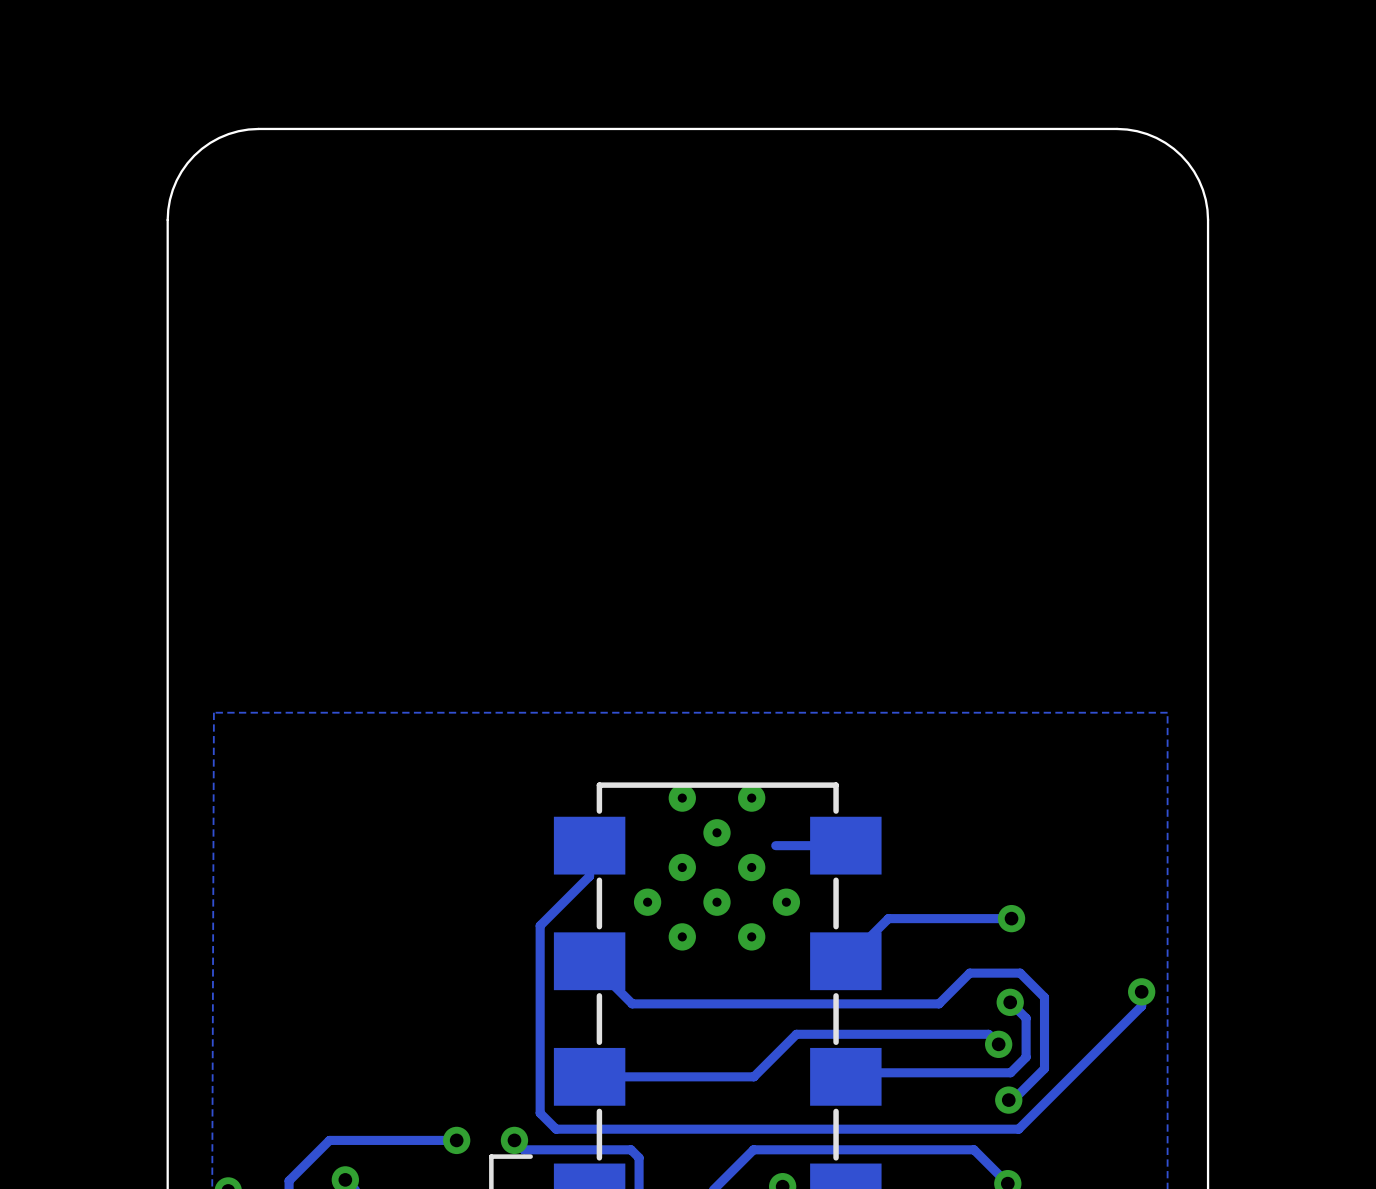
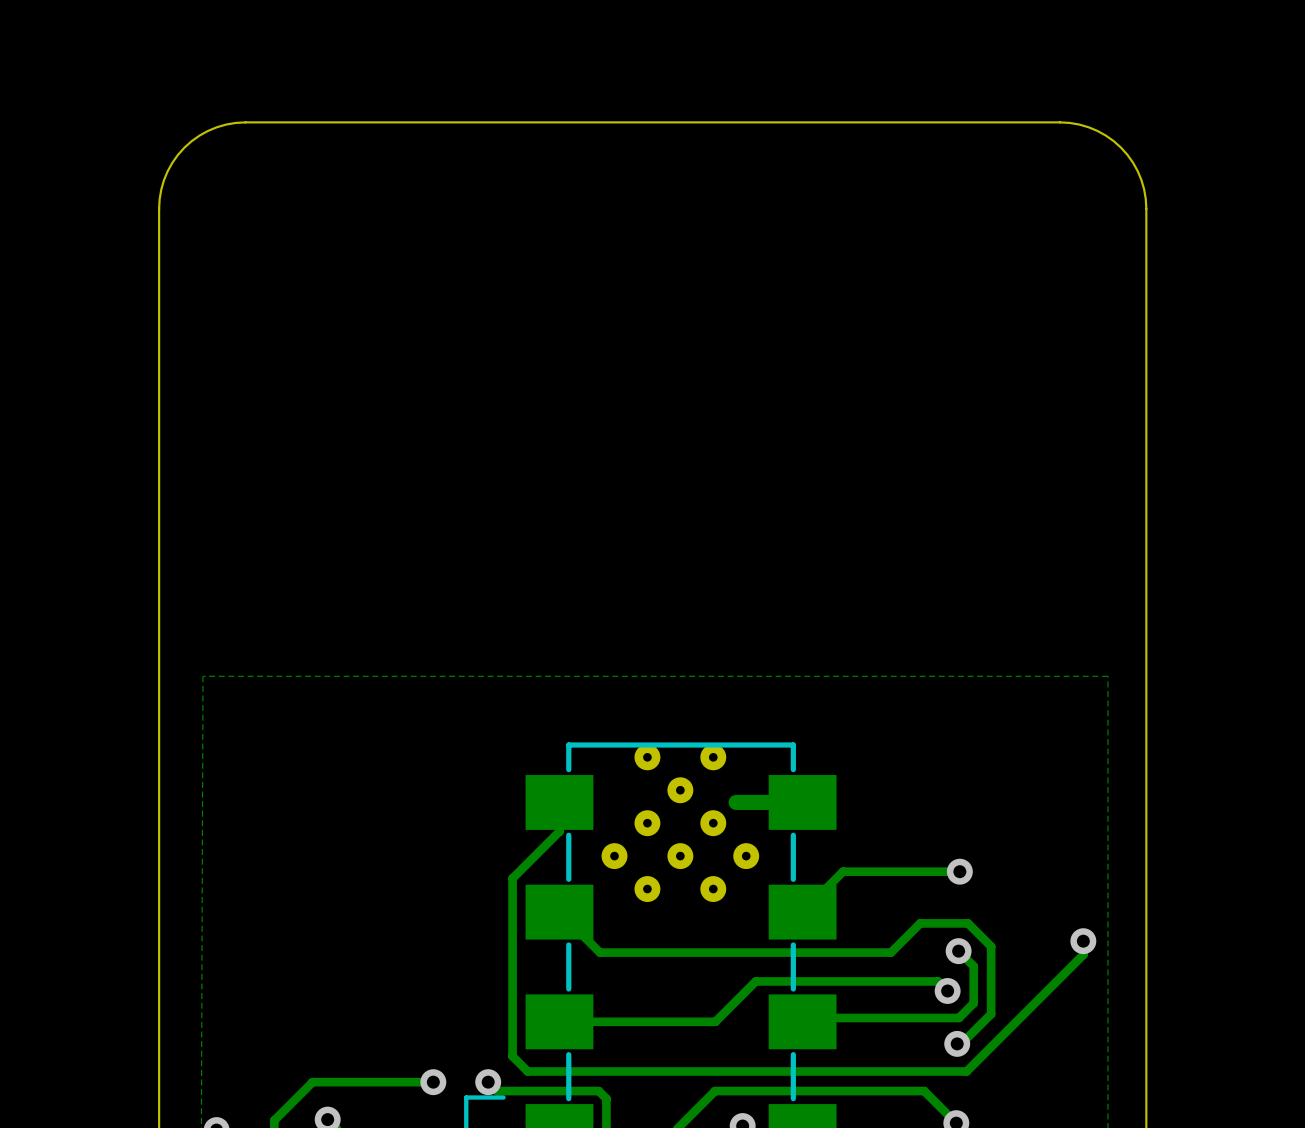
track width: thin (845, 845) (775, 845) -> thick (802, 802) (736, 802)

